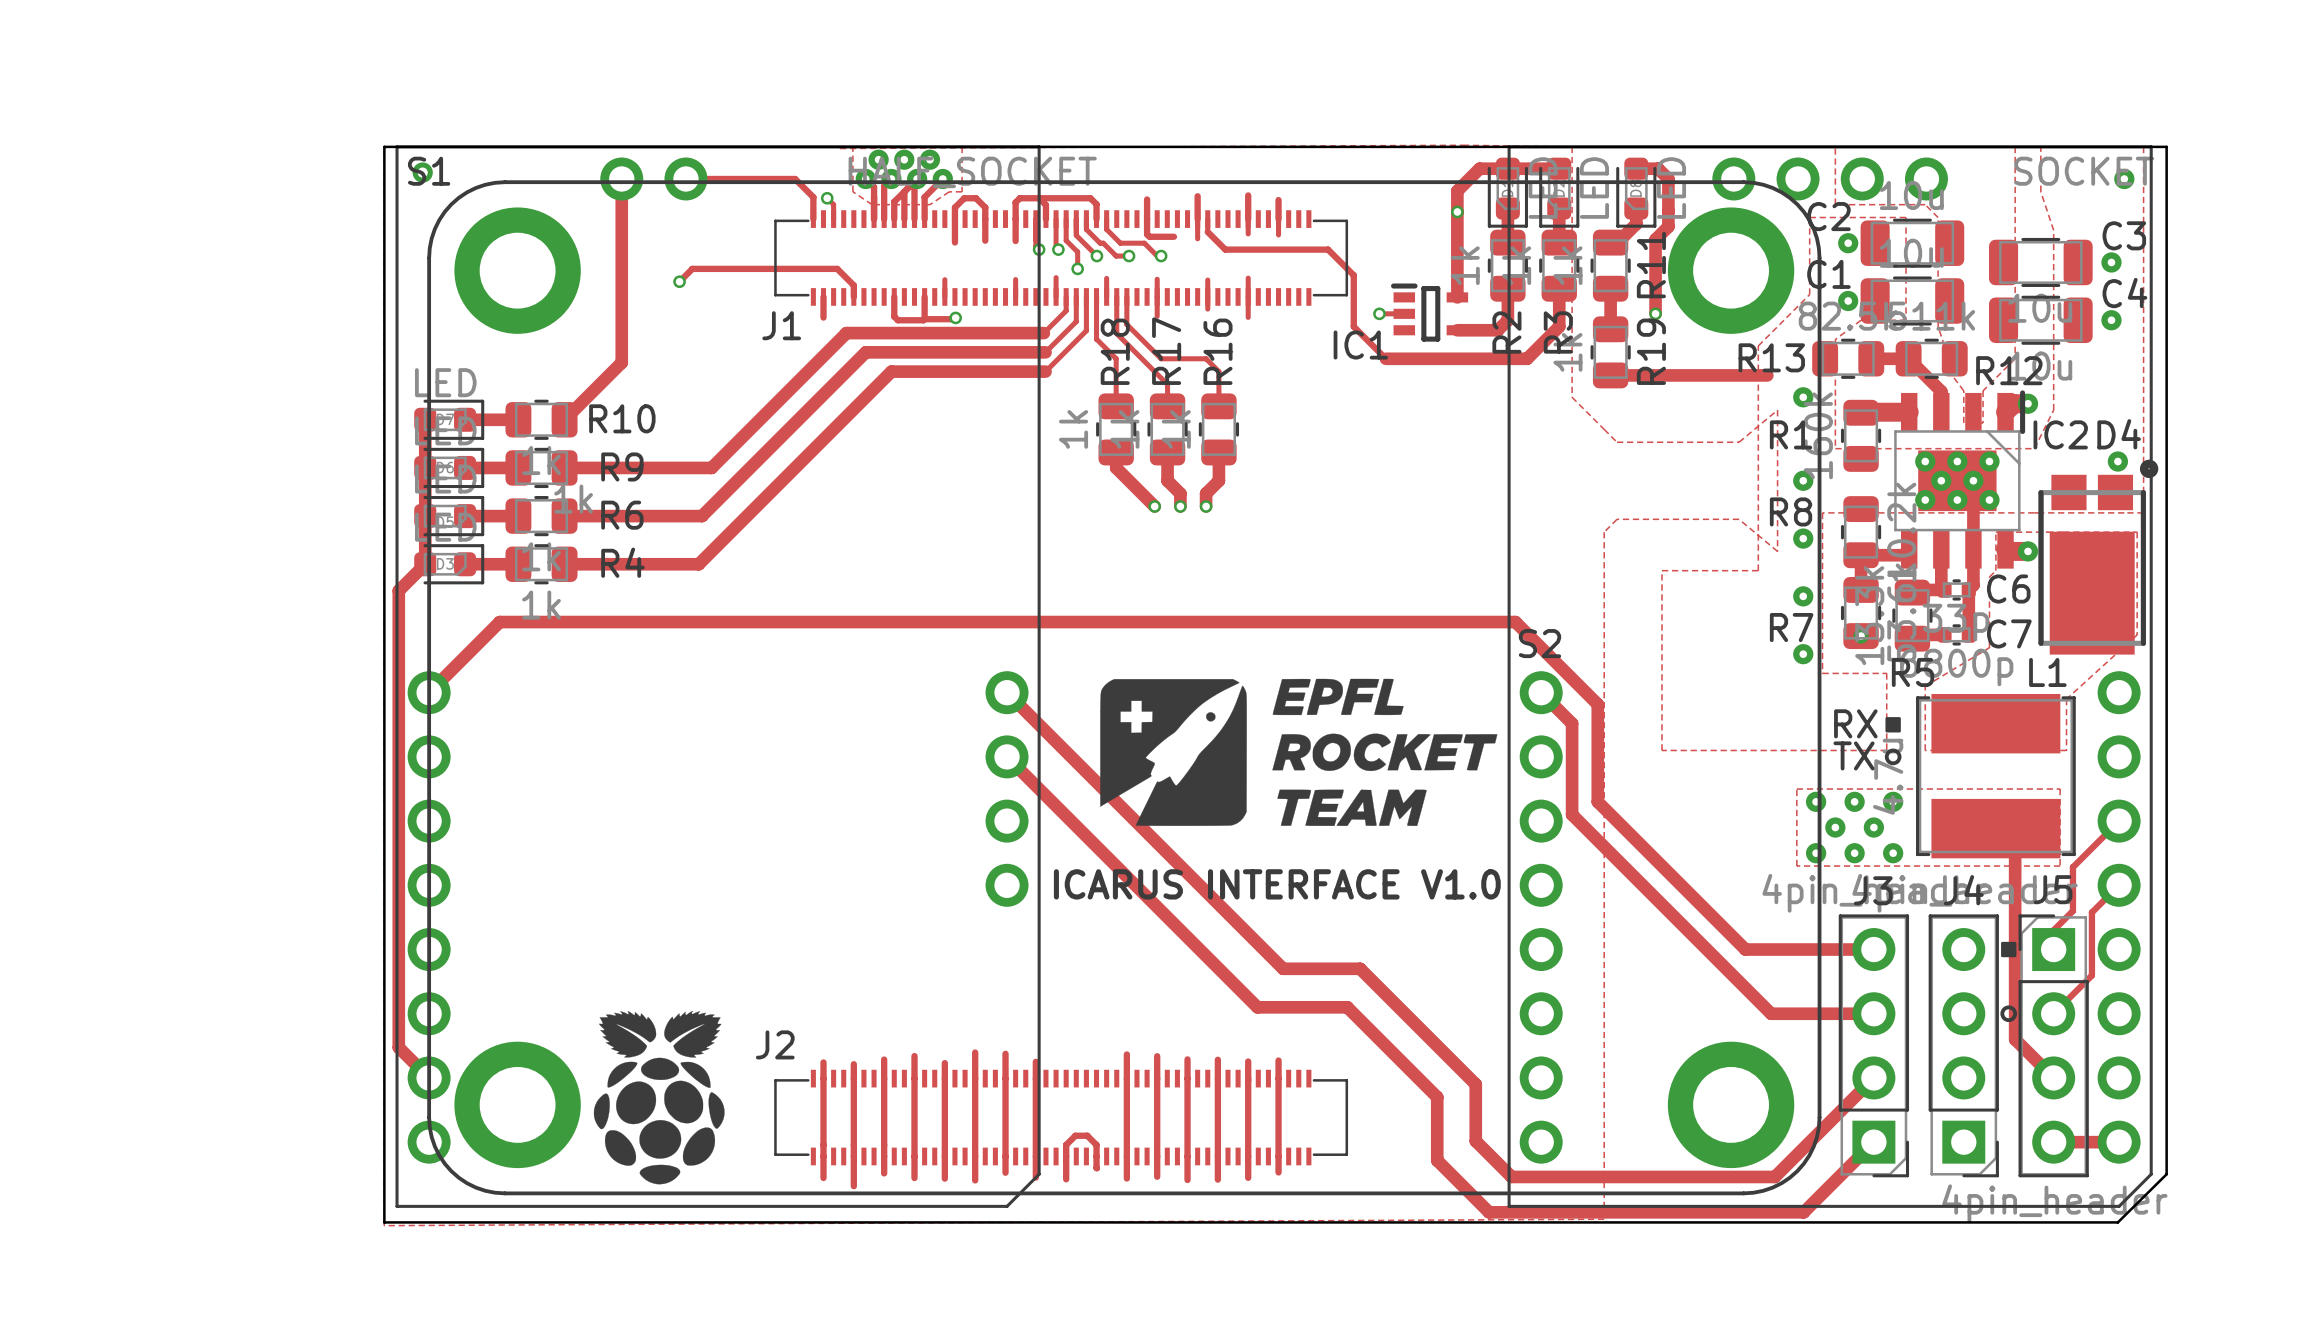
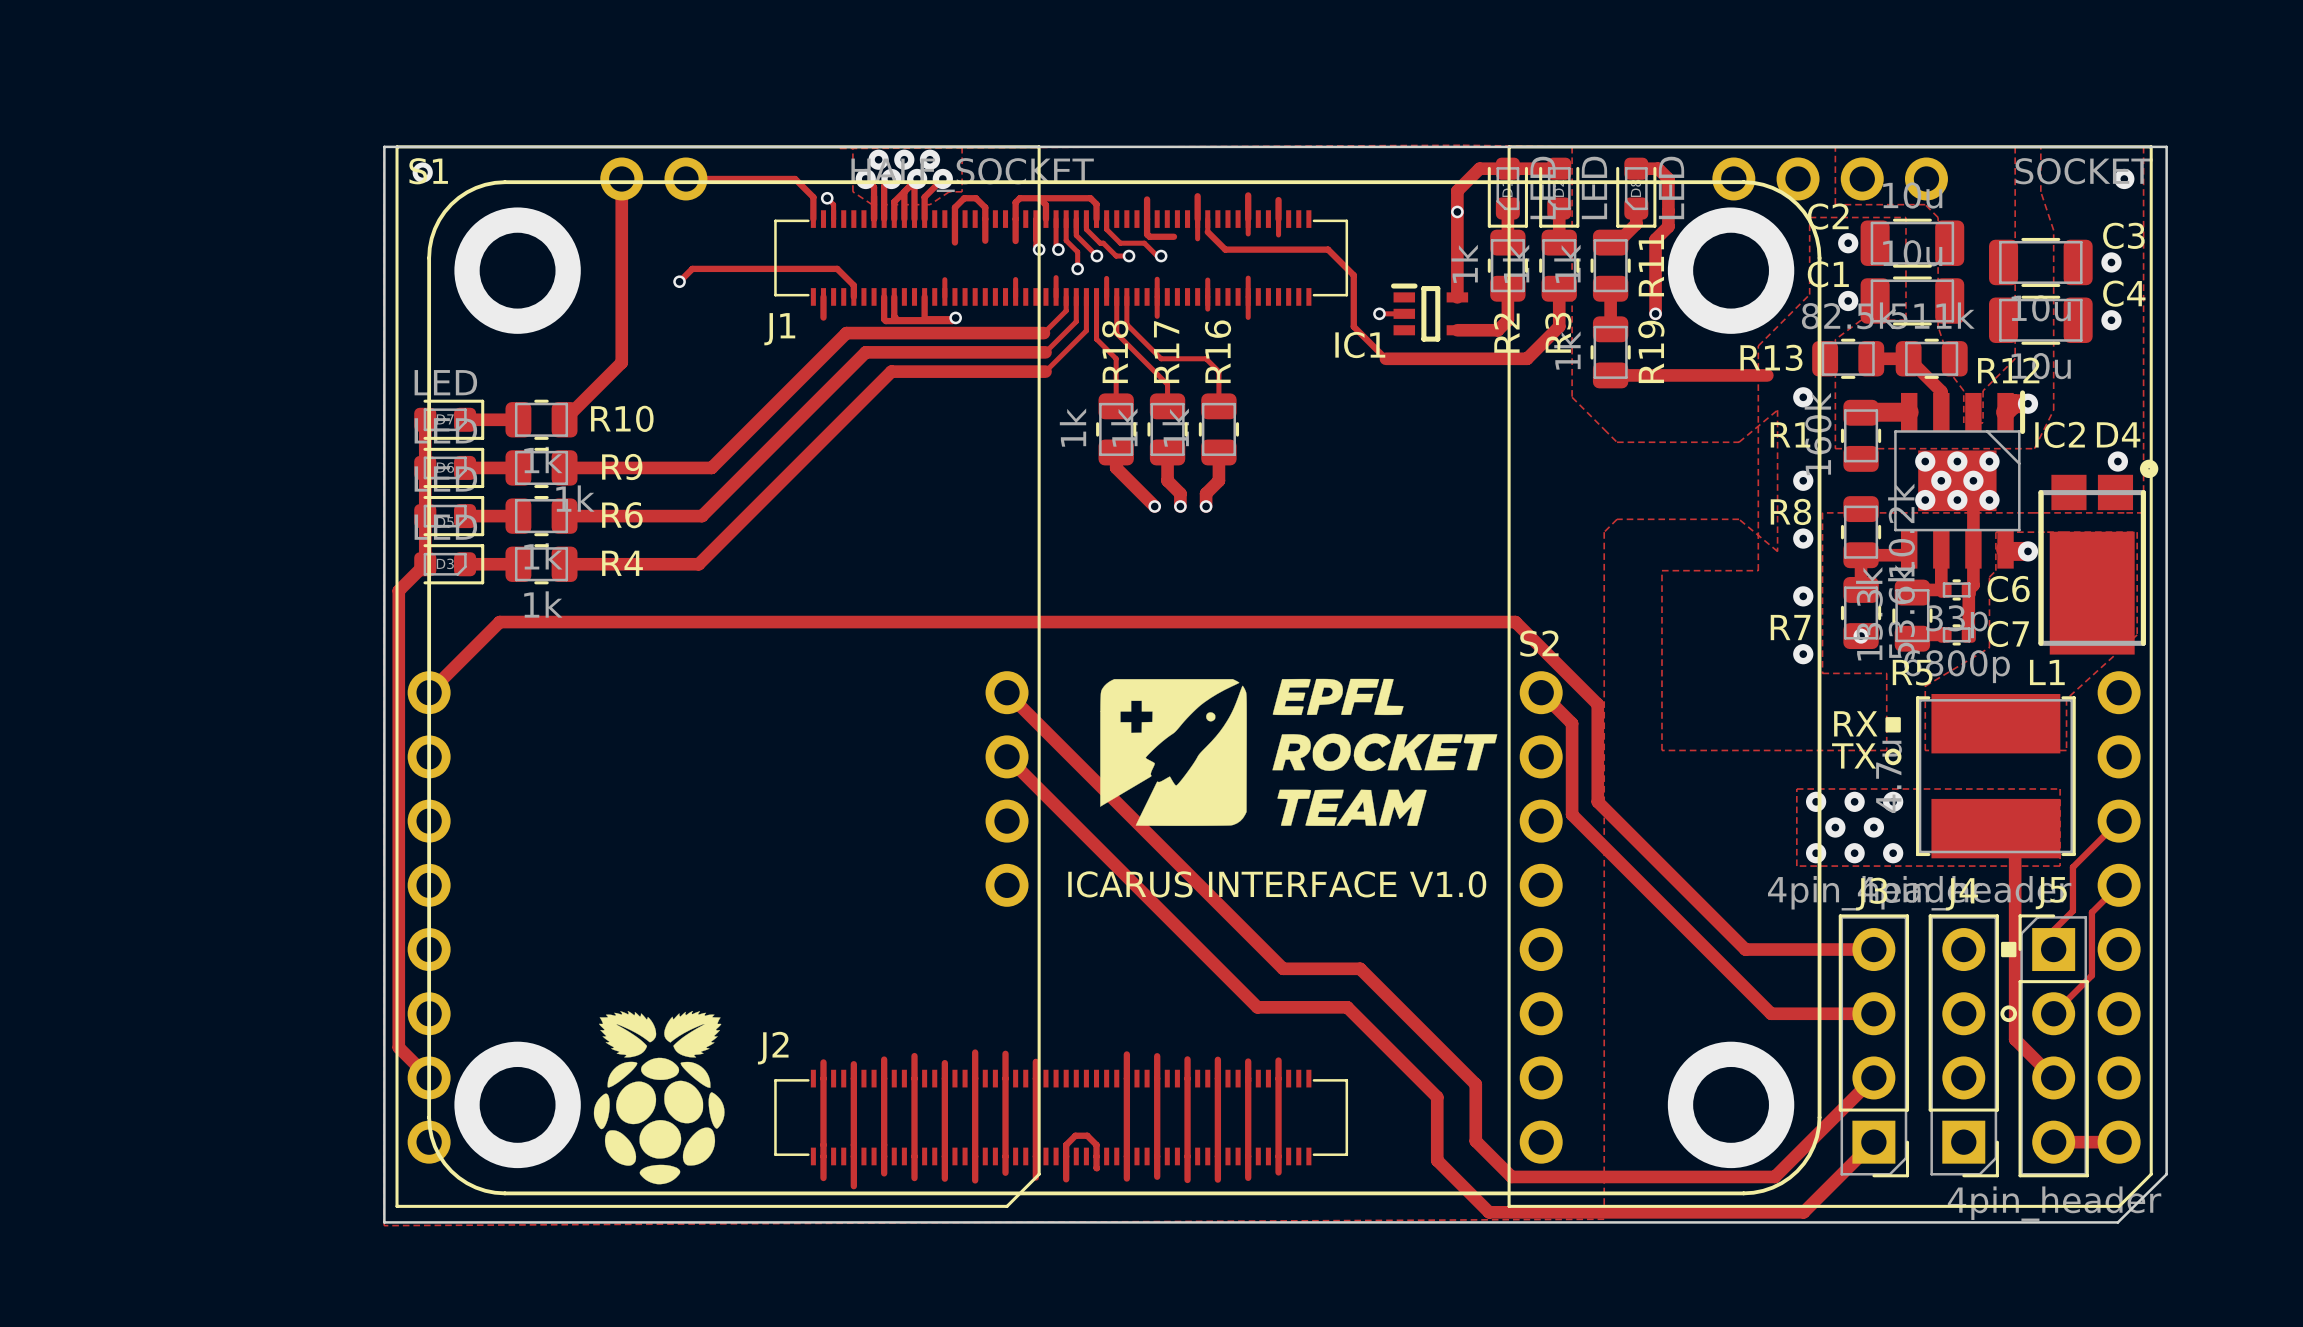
track: none -> (884, 296) (884, 319) (885, 321) (952, 321) (954, 319)

